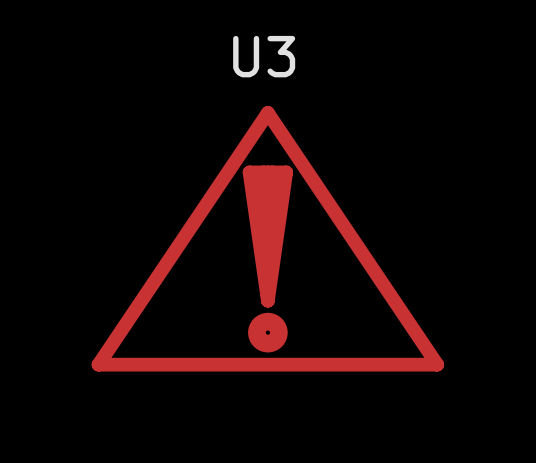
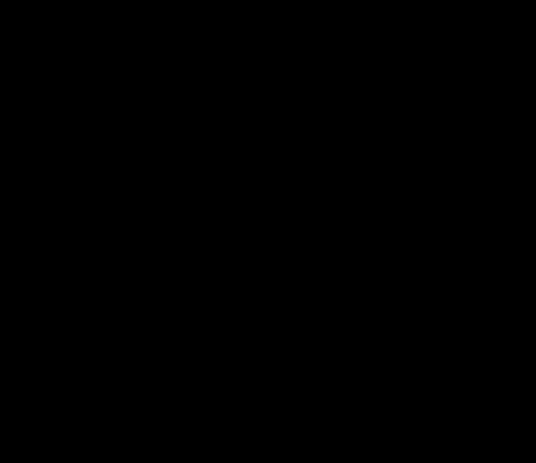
U3: (267, 238) -> none

